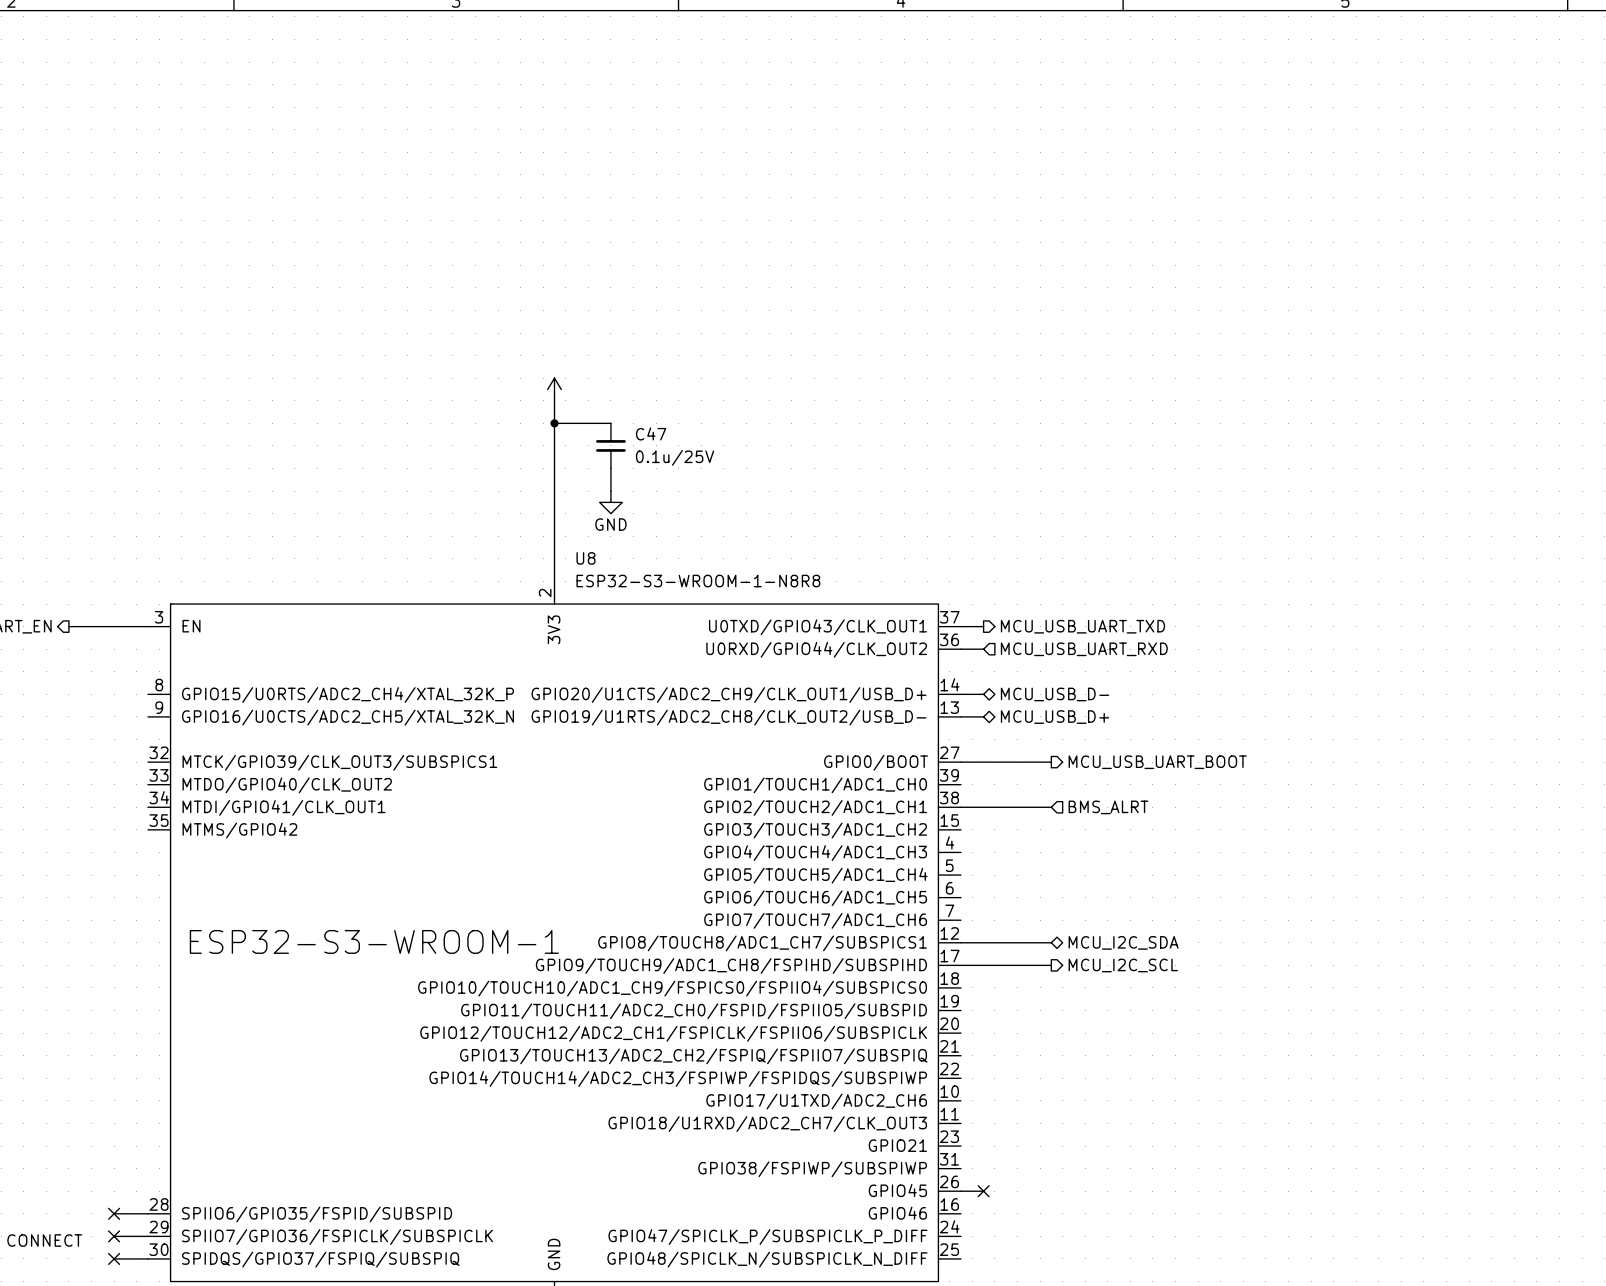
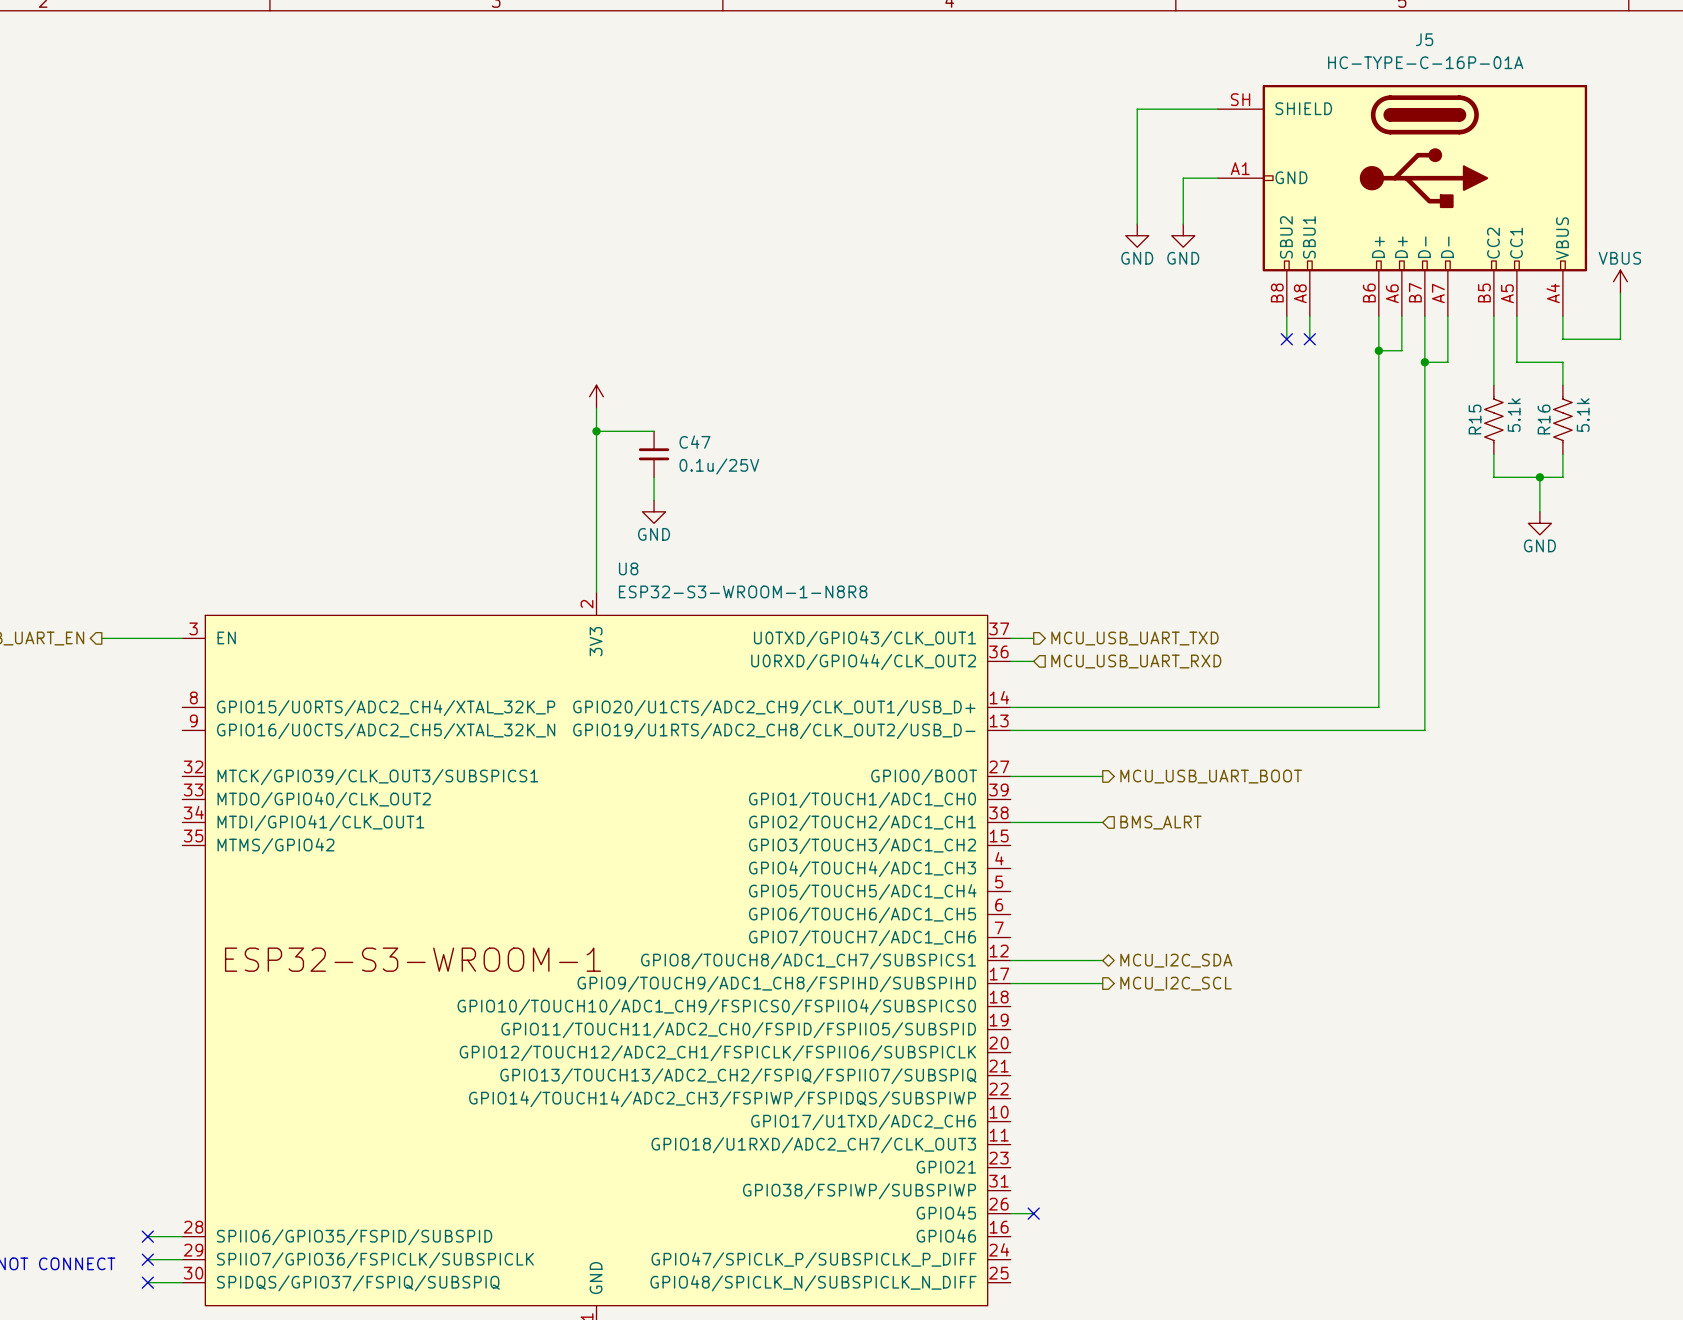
wire: none -> (1217, 109) (1137, 109) (1137, 224)
wire: none -> (1217, 178) (1183, 178) (1183, 224)
J5: none -> HC-TYPE-C-16P-01A (1402, 200)
power symbol: none -> GND (1137, 235)
power symbol: none -> GND (1183, 235)
power symbol: none -> VBUS (1620, 281)
wire: none -> (1620, 293) (1620, 339) (1562, 339) (1562, 316)
wire: none -> (1286, 316) (1286, 339)
wire: none -> (1309, 316) (1309, 339)
wire: none -> (1378, 316) (1378, 707) (1033, 707)
wire: none -> (1401, 316) (1401, 350) (1378, 350)
wire: none -> (1424, 316) (1424, 730) (1033, 730)
wire: none -> (1447, 316) (1447, 362) (1424, 362)
wire: none -> (1493, 316) (1493, 385)
wire: none -> (1516, 316) (1516, 362) (1562, 362) (1562, 385)
no-connect mark: none -> (1286, 339)
no-connect mark: none -> (1309, 339)
junction: none -> (1378, 350)
junction: none -> (1424, 362)
R15: none -> 5.1k (1493, 419)
R16: none -> 5.1k (1562, 419)
wire: none -> (1493, 454) (1493, 477) (1562, 477) (1562, 454)
wire: none -> (1539, 477) (1539, 511)
junction: none -> (1539, 477)
power symbol: none -> GND (1539, 523)
hierarchical label: MCU_USB_D- (1055, 694) -> none
hierarchical label: MCU_USB_D+ (1055, 717) -> none

